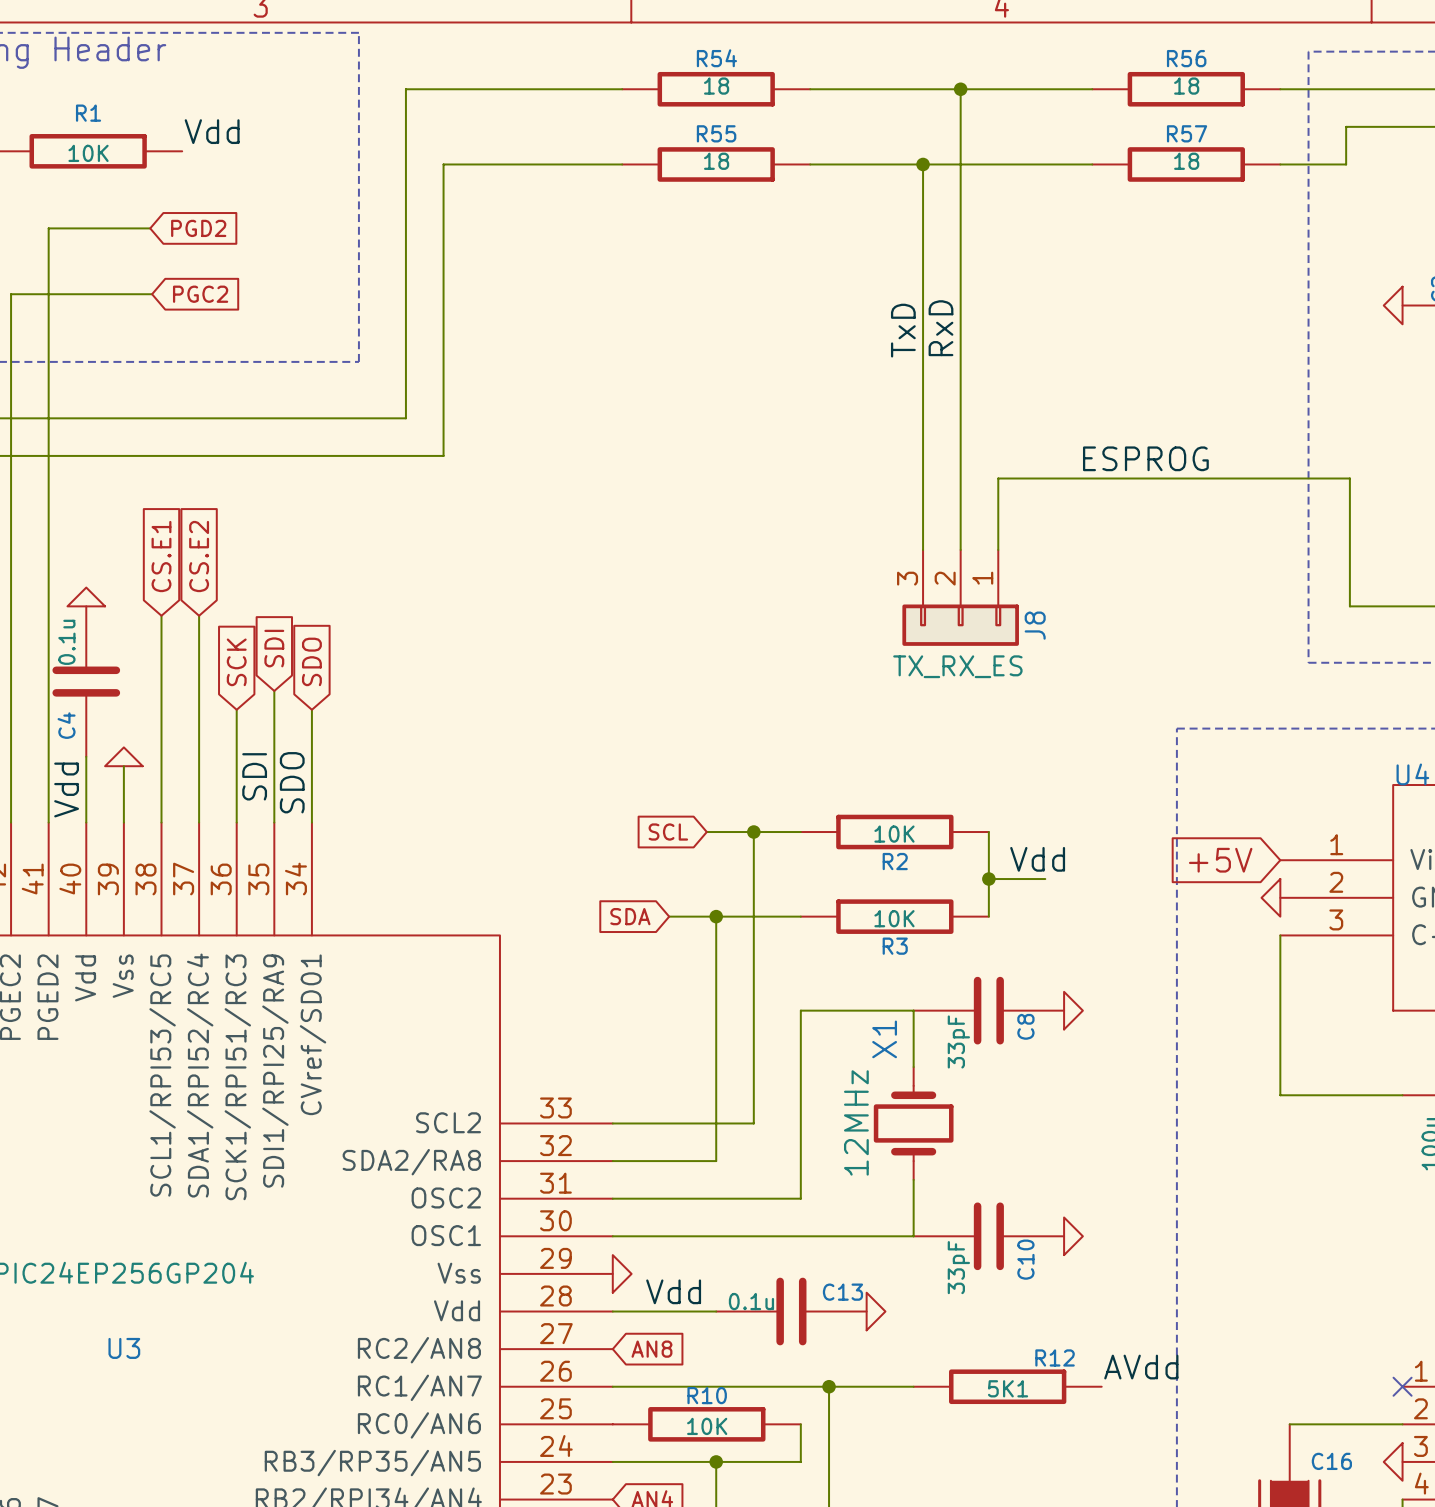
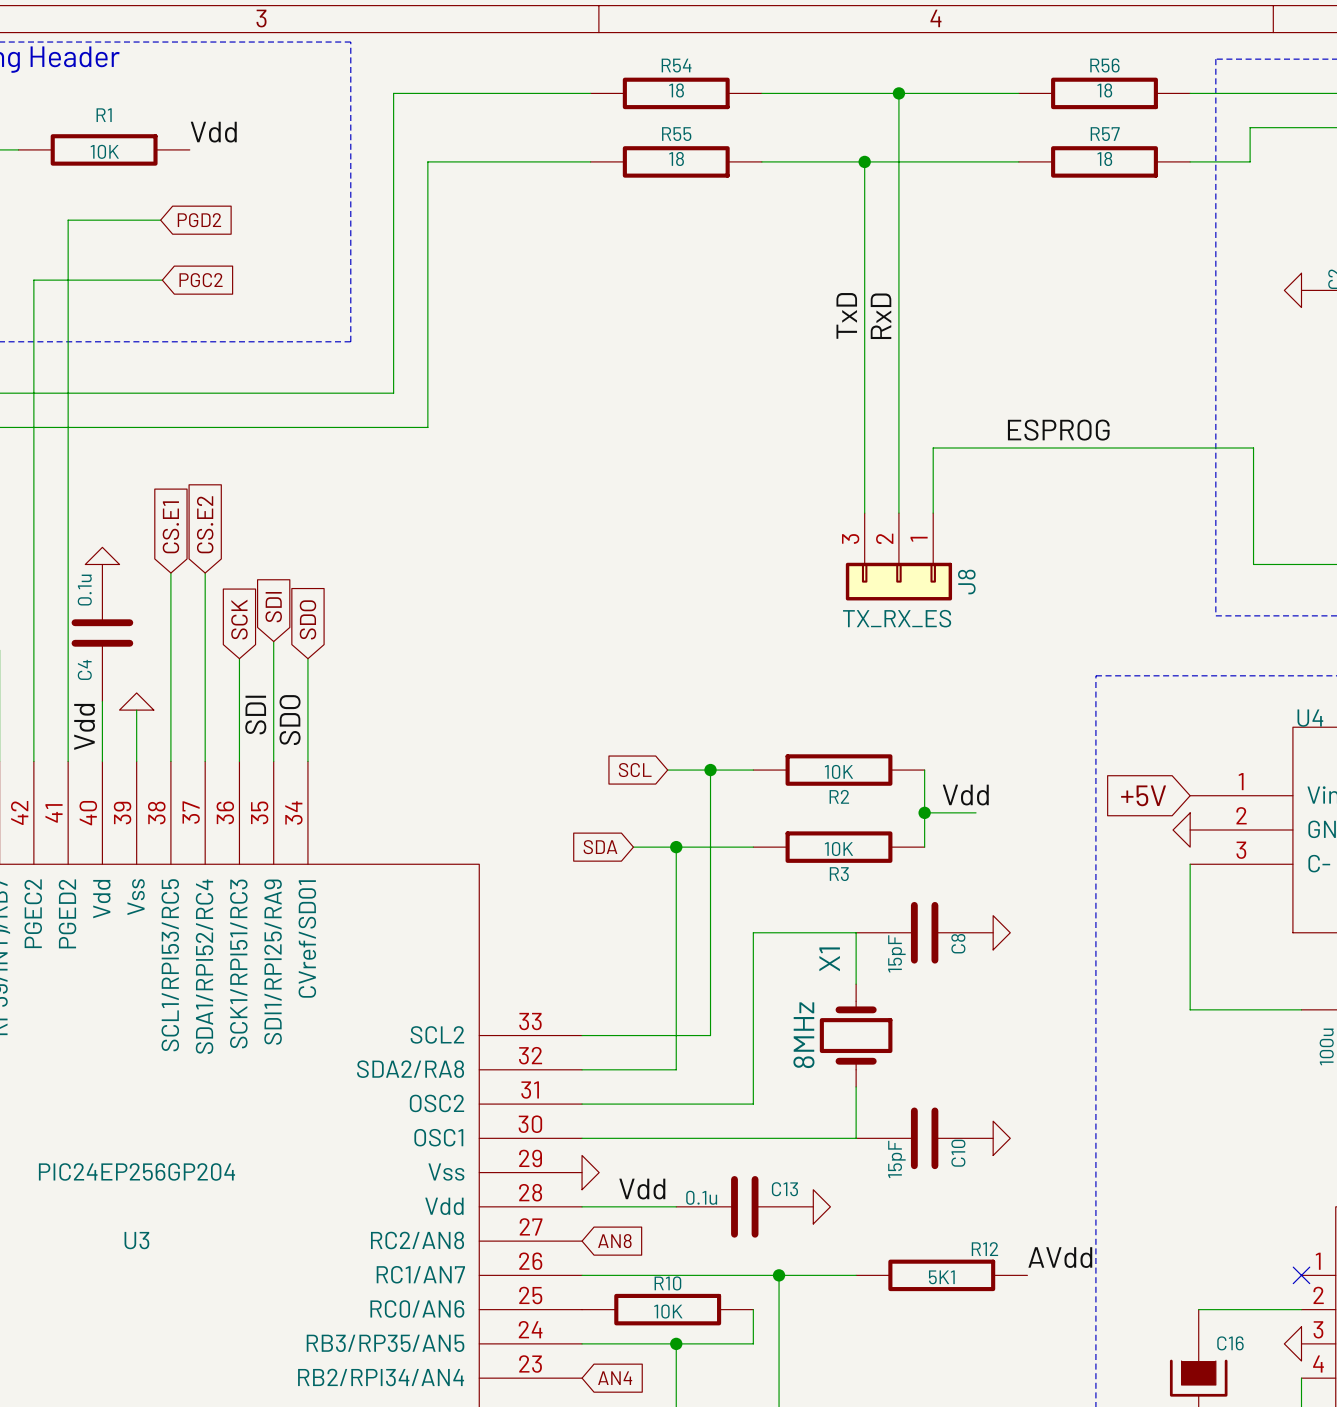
C8 value: 33pF (958, 1041) -> 15pF (896, 953)
X1 value: 12MHz (856, 1122) -> 8MHz (803, 1035)
C10 value: 33pF (958, 1267) -> 15pF (896, 1159)

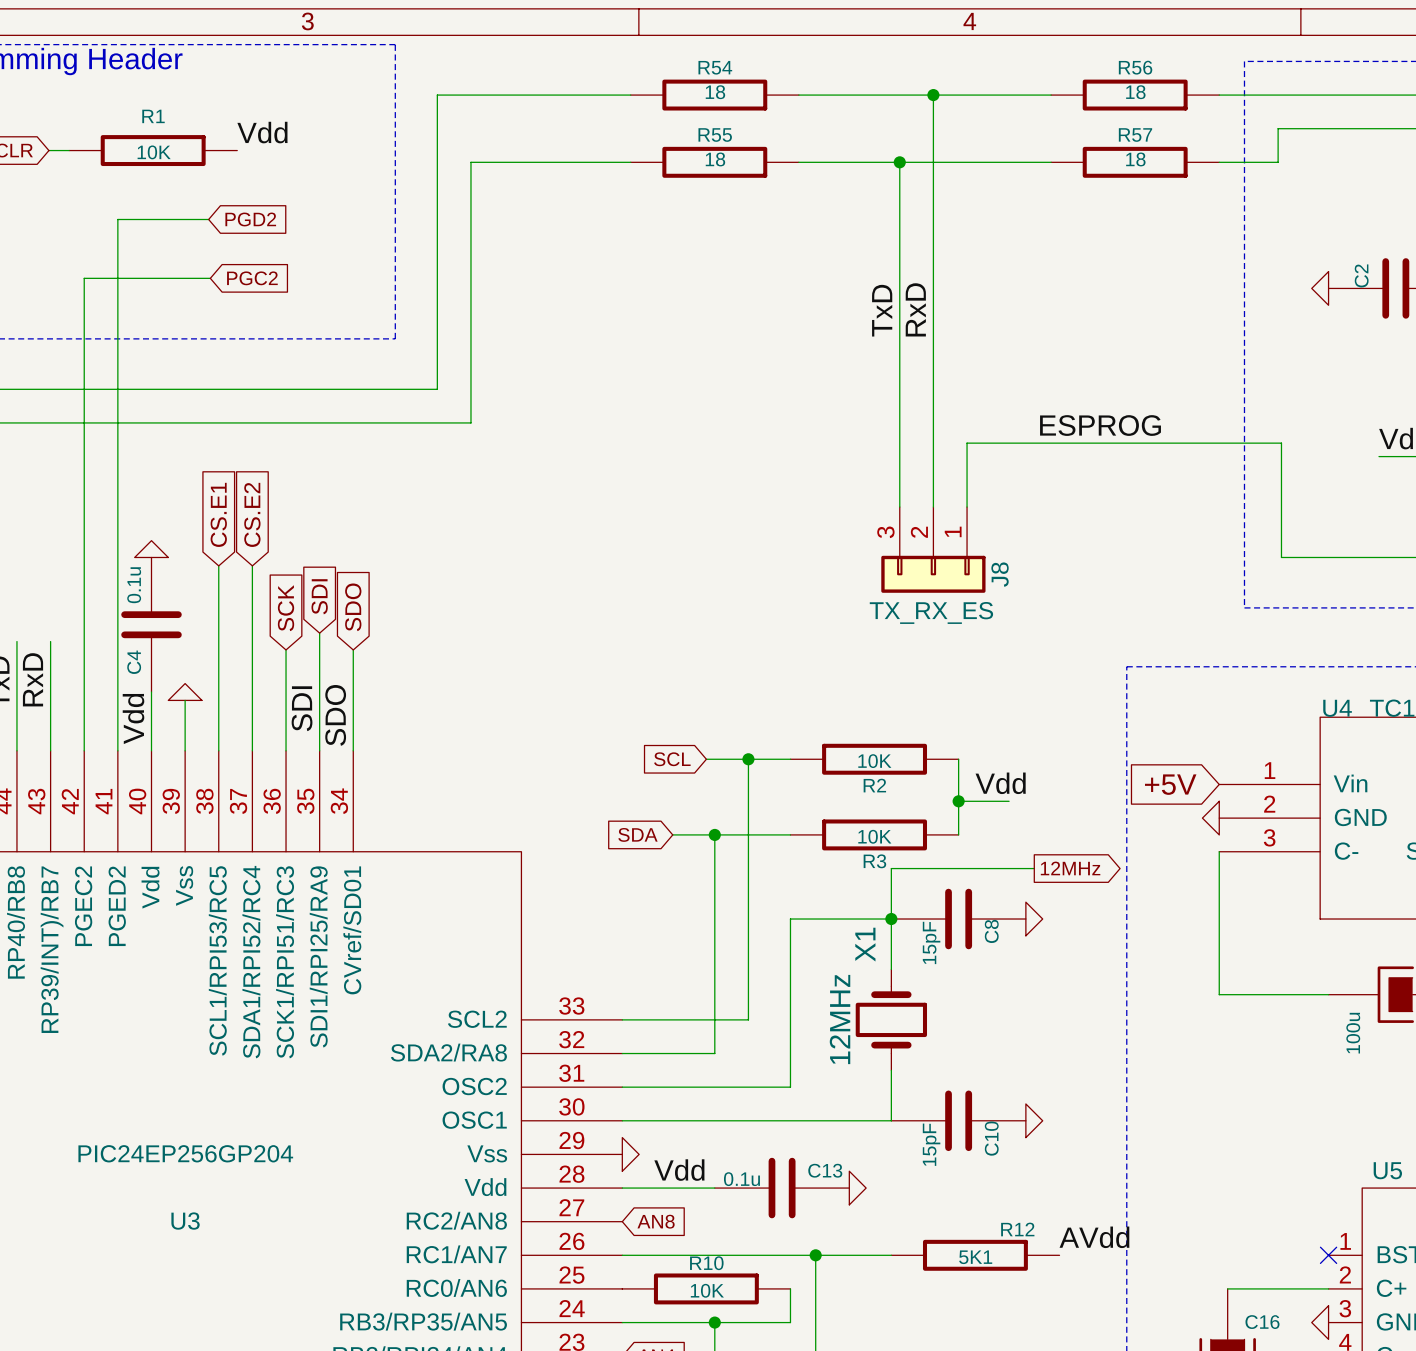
wire: none -> (1034, 868) (891, 868) (891, 919)
global label: none -> 12MHz (1070, 868)
junction: none -> (891, 919)
X1 value: 8MHz (803, 1035) -> 12MHz (840, 1019)

